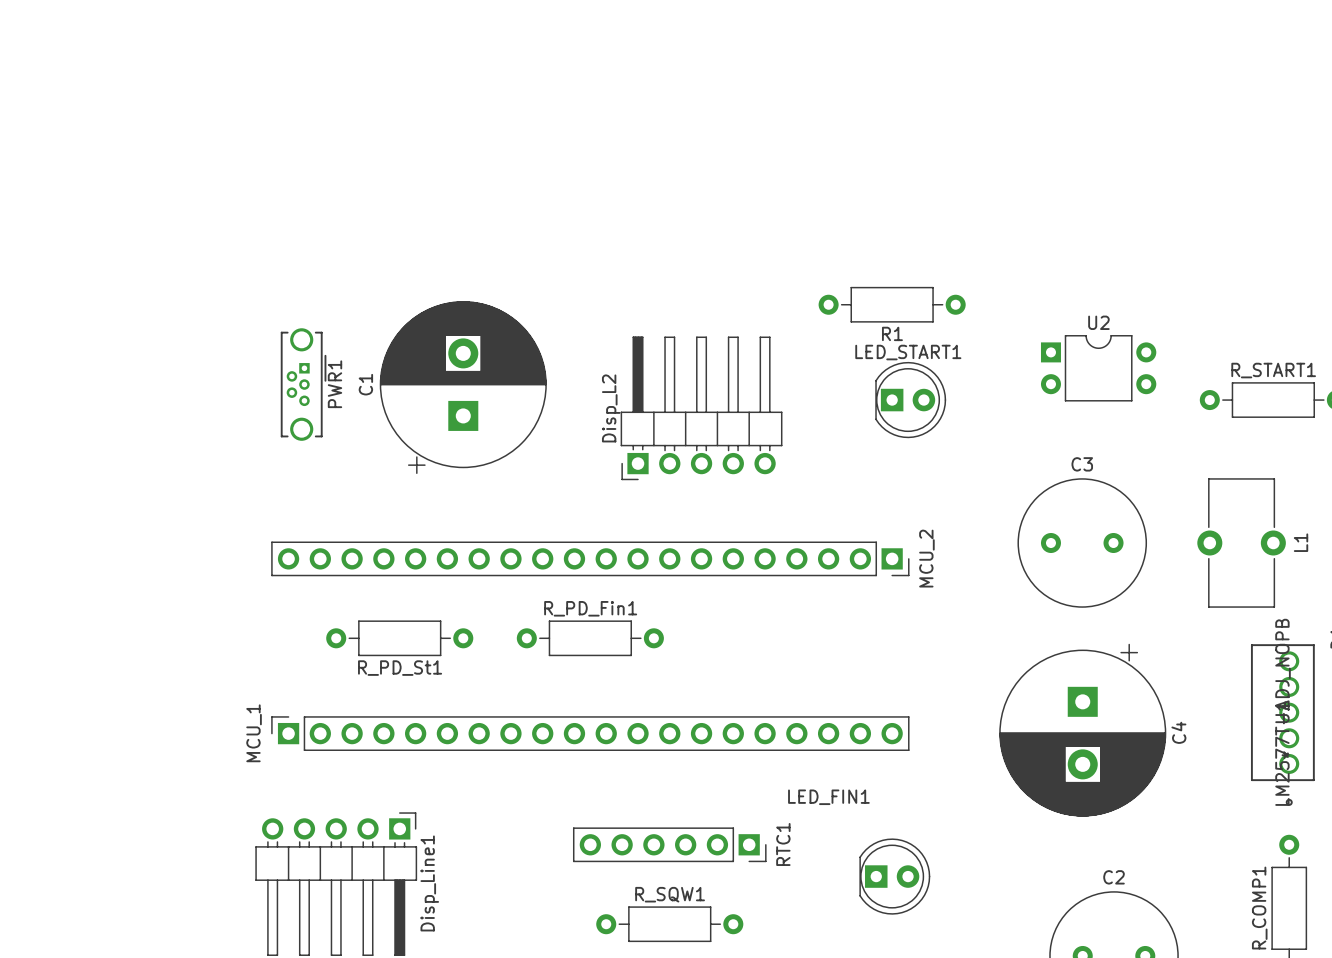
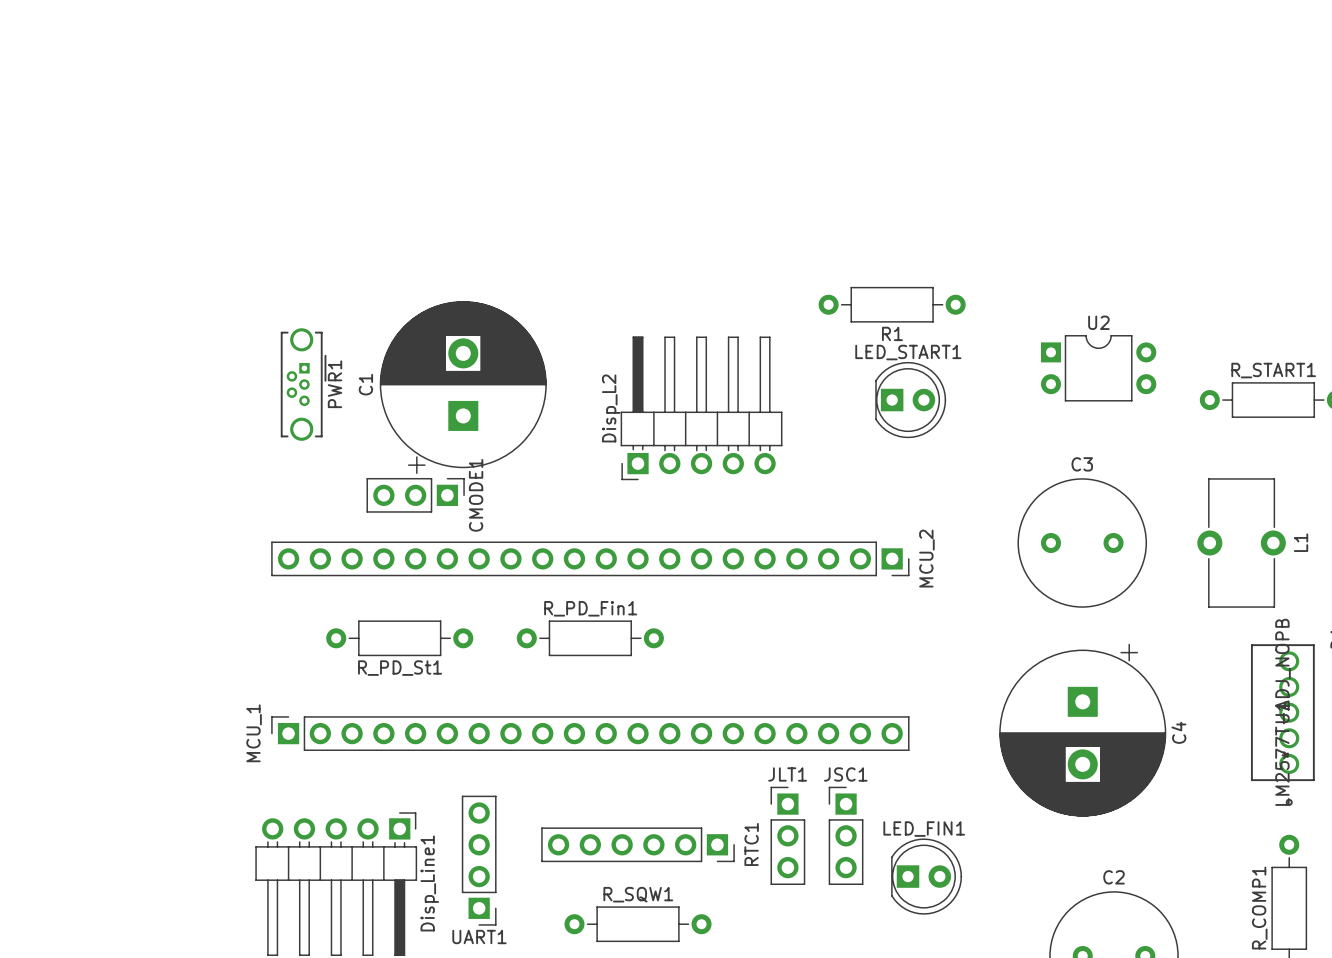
CMODE1: none -> (415, 495)
LED_FIN1 name position: LED_FIN1 (828, 797) -> LED_FIN1 (924, 829)
JLT1: none -> (787, 835)
JSC1: none -> (846, 835)
RTC1 position: (669, 844) -> (638, 844)
UART1: none -> (479, 860)
LED_FIN1 position: (894, 876) -> (926, 876)
R_SQW1 position: (669, 924) -> (638, 924)

